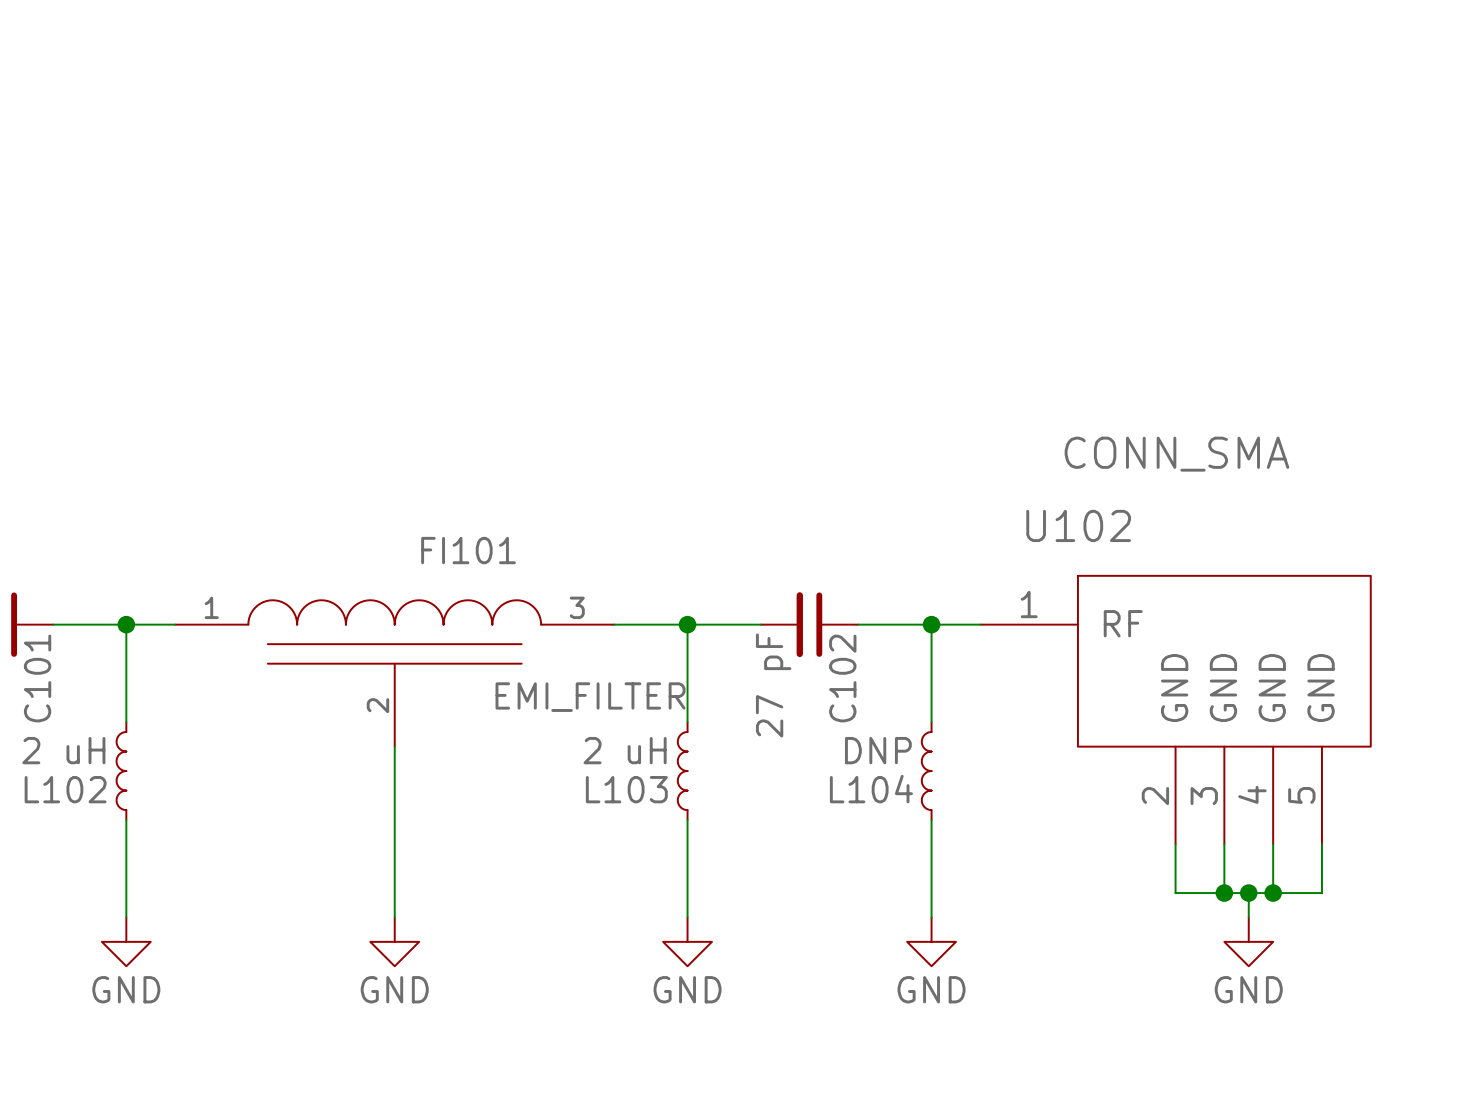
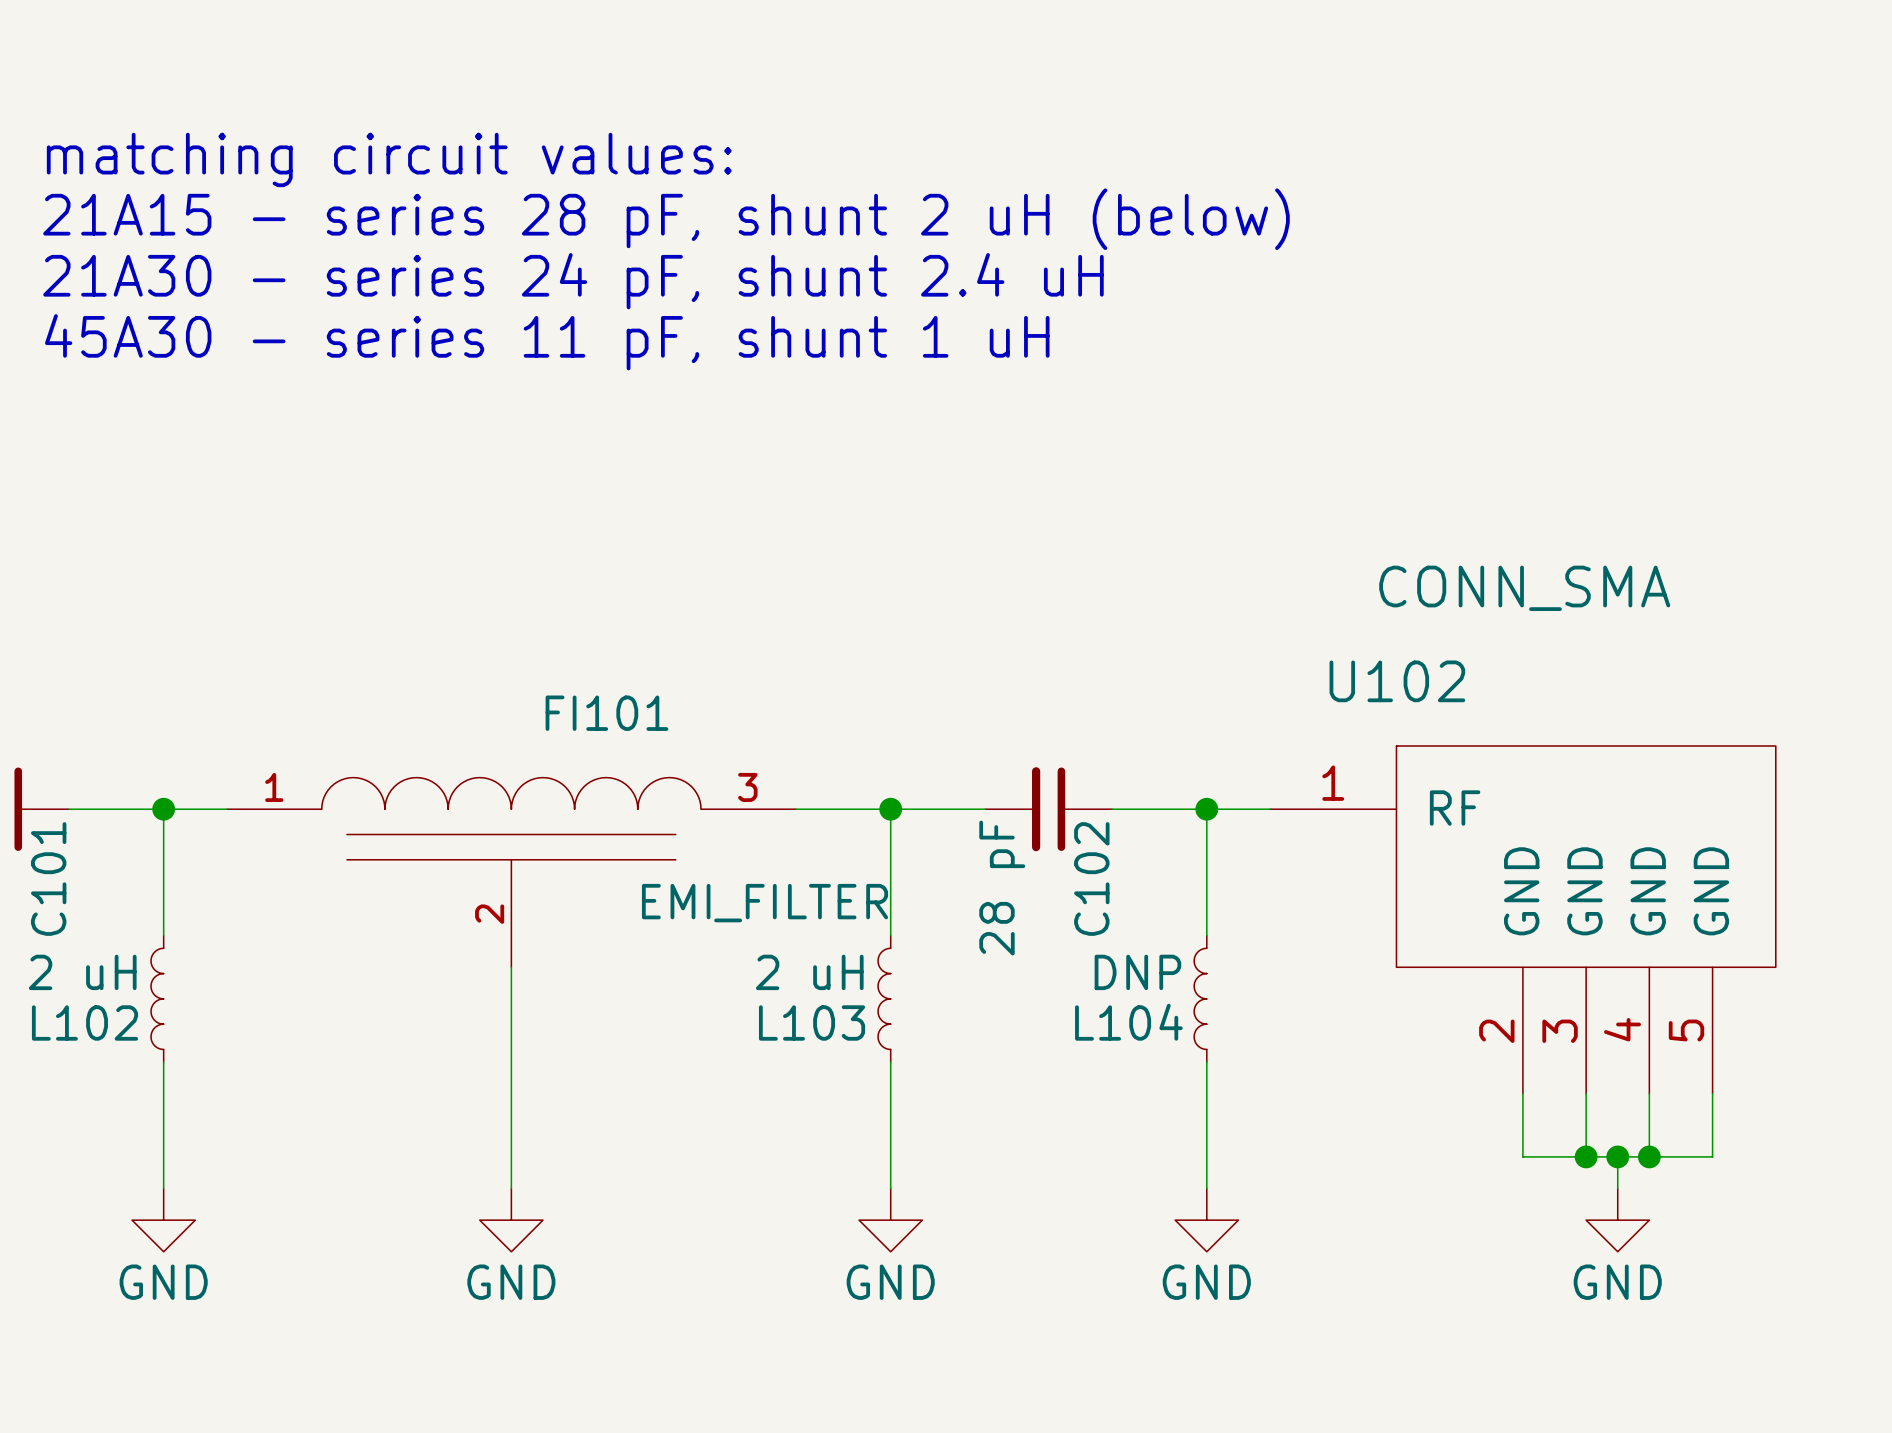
text: none -> matching circuit values: (389, 159)
text: none -> 21A15 - series 28 pF, shunt 2 uH (below) (666, 219)
text: none -> 21A30 - series 24 pF, shunt 2.4 uH (573, 281)
text: none -> 45A30 - series 11 pF, shunt 1 uH (547, 342)
C102 value: 27 pF (773, 685) -> 28 pF (1002, 888)

